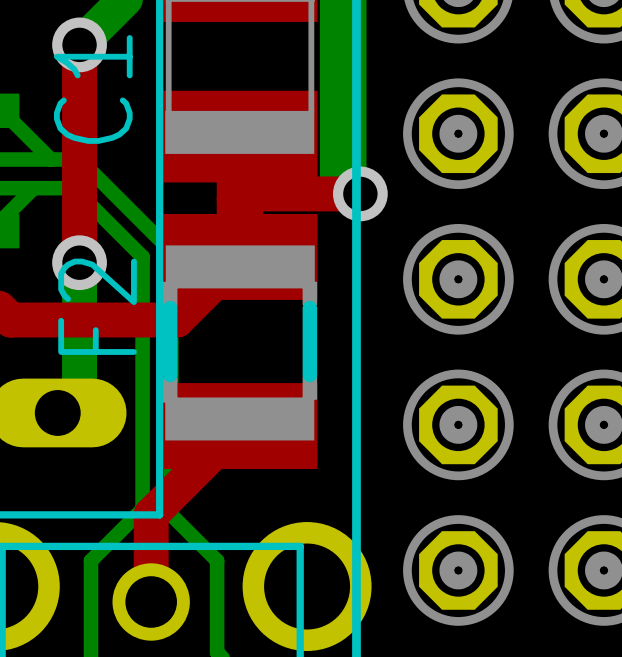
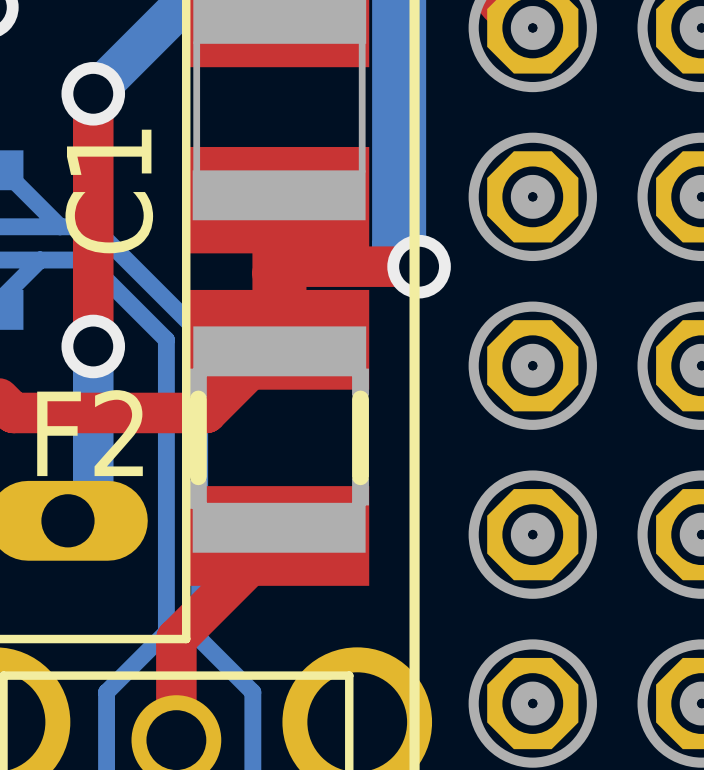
C1 name position: C1 (93, 89) -> C1 (109, 191)
F2 name rotation: 0° (97, 306) -> 90° clockwise (90, 433)

